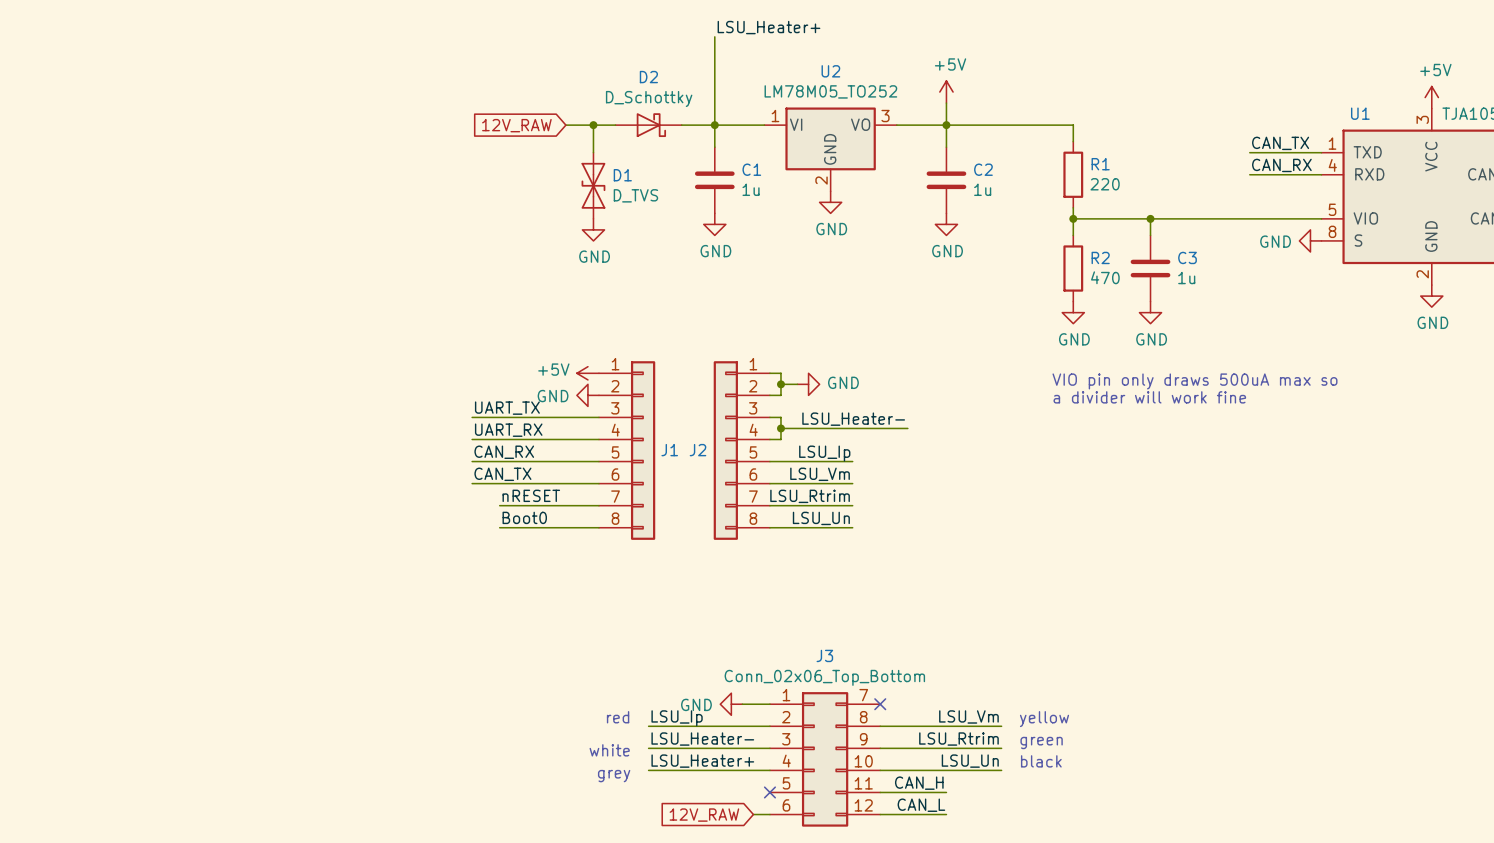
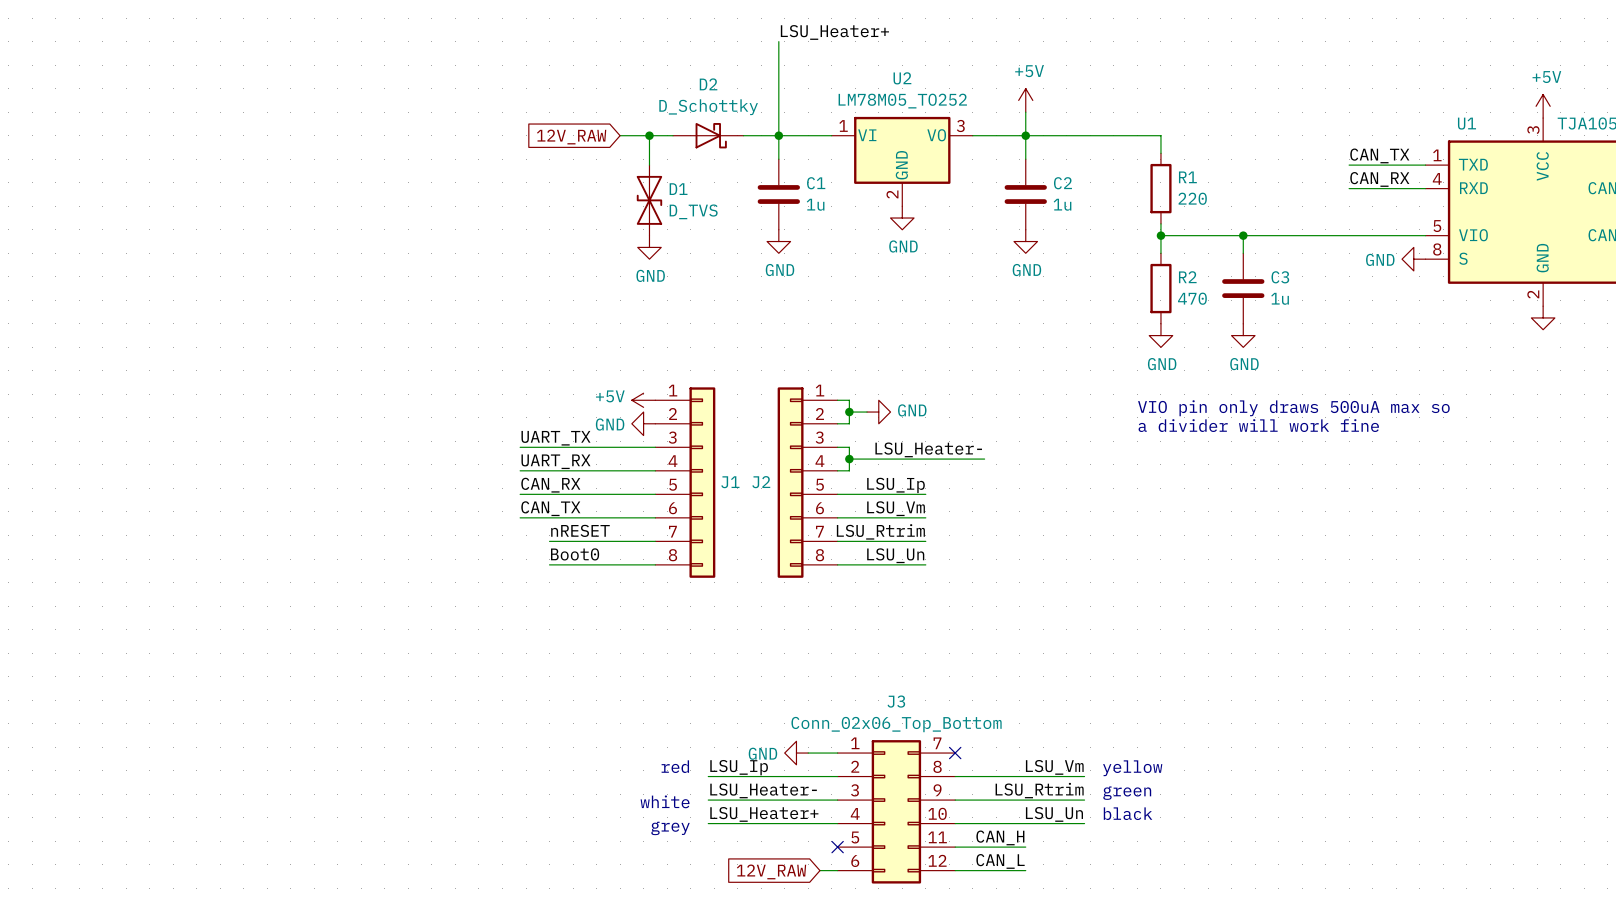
power symbol text: GND (1432, 322) -> none

